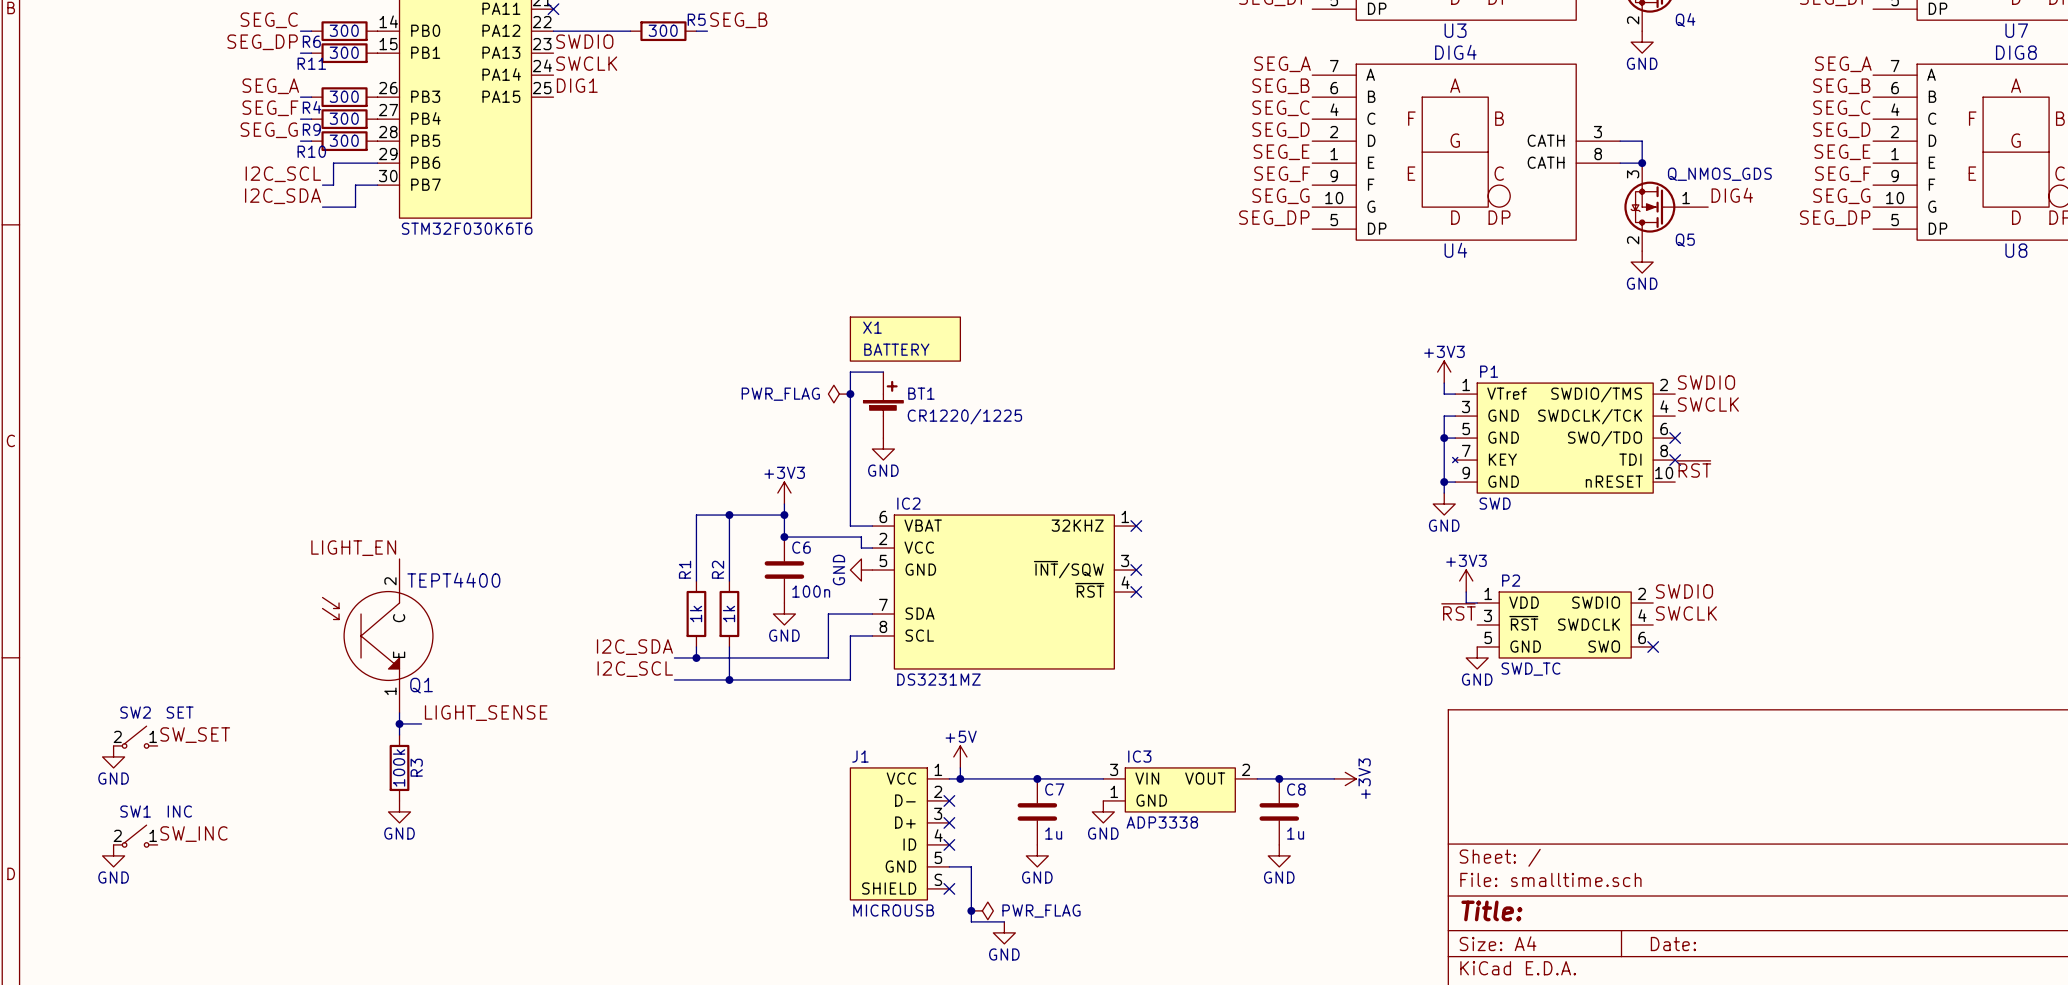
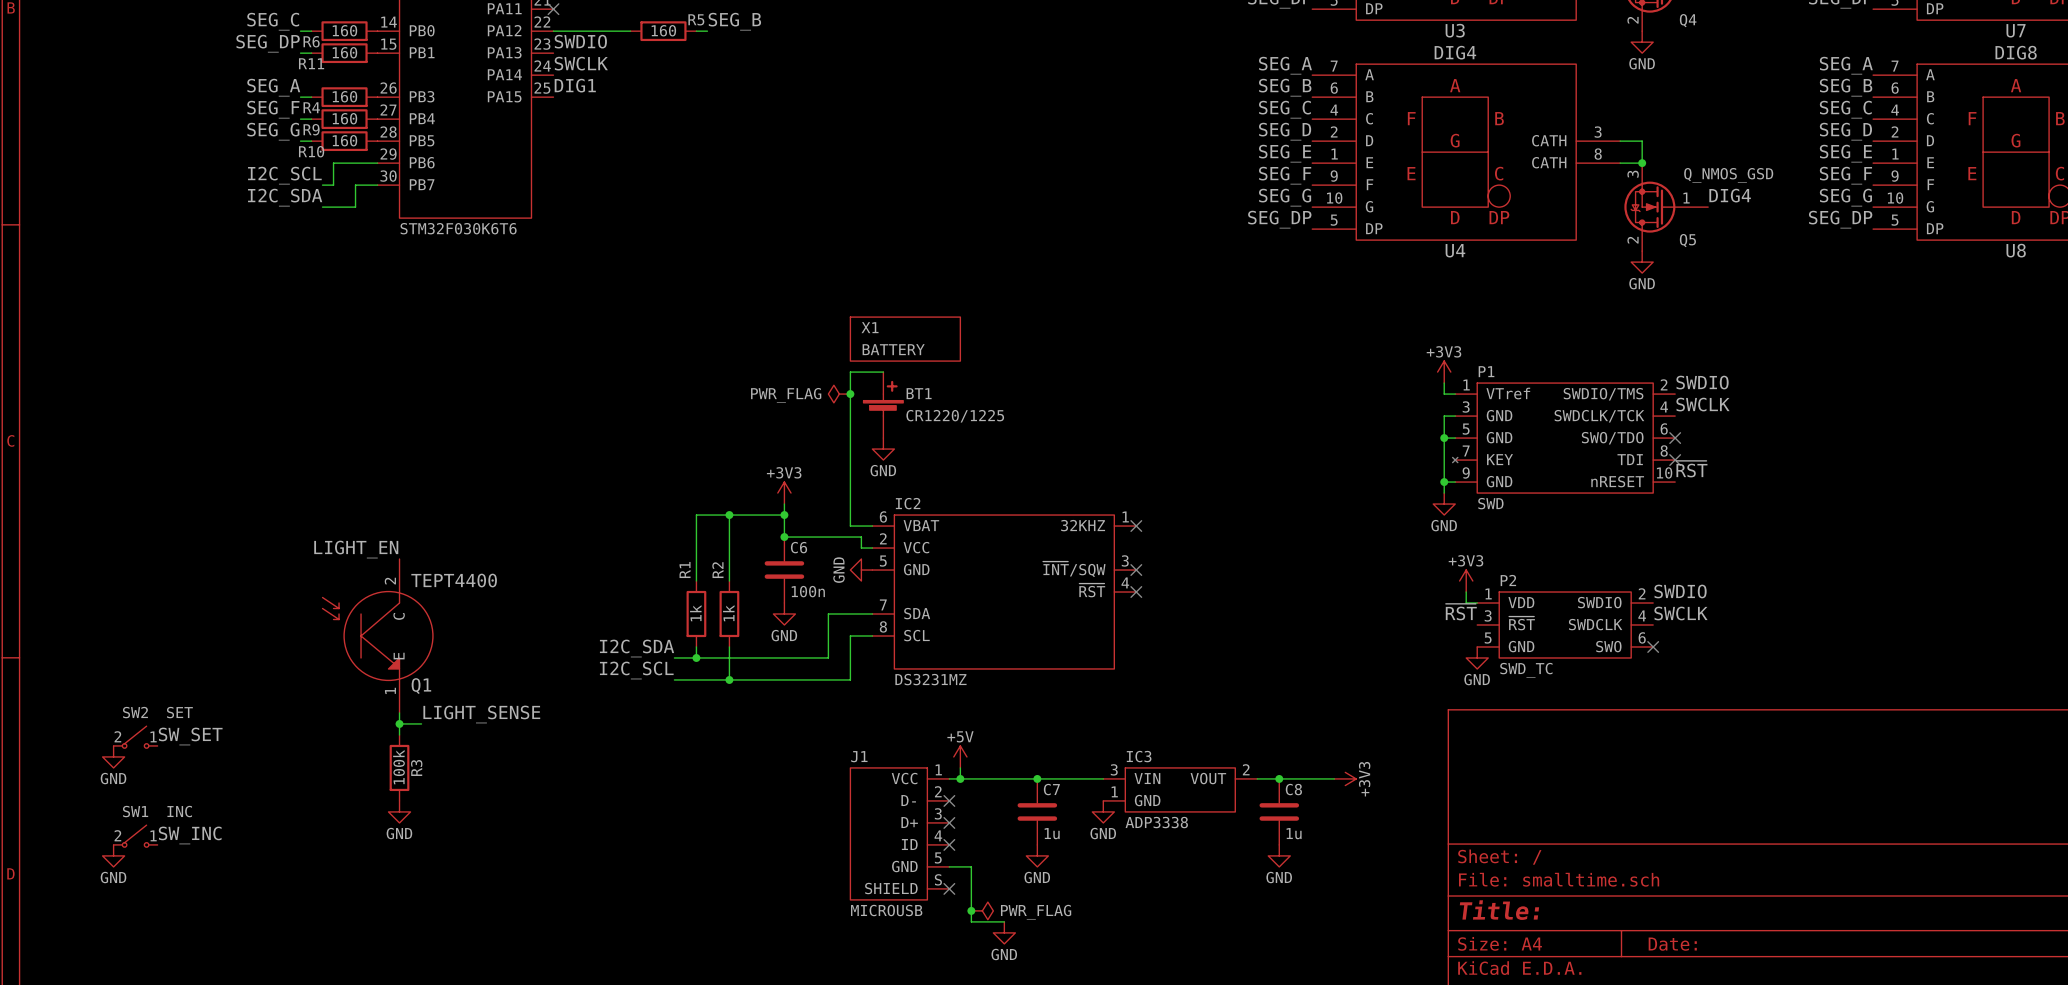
R6 value: 300 (344, 30) -> 160 (344, 30)
R5 value: 300 (663, 30) -> 160 (663, 30)
R11 value: 300 (344, 52) -> 160 (344, 52)
R4 value: 300 (344, 96) -> 160 (344, 96)
R9 value: 300 (344, 118) -> 160 (344, 118)
R10 value: 300 (344, 140) -> 160 (344, 140)
Q5 value: Q_NMOS_GDS (1719, 174) -> Q_NMOS_GSD (1728, 175)

